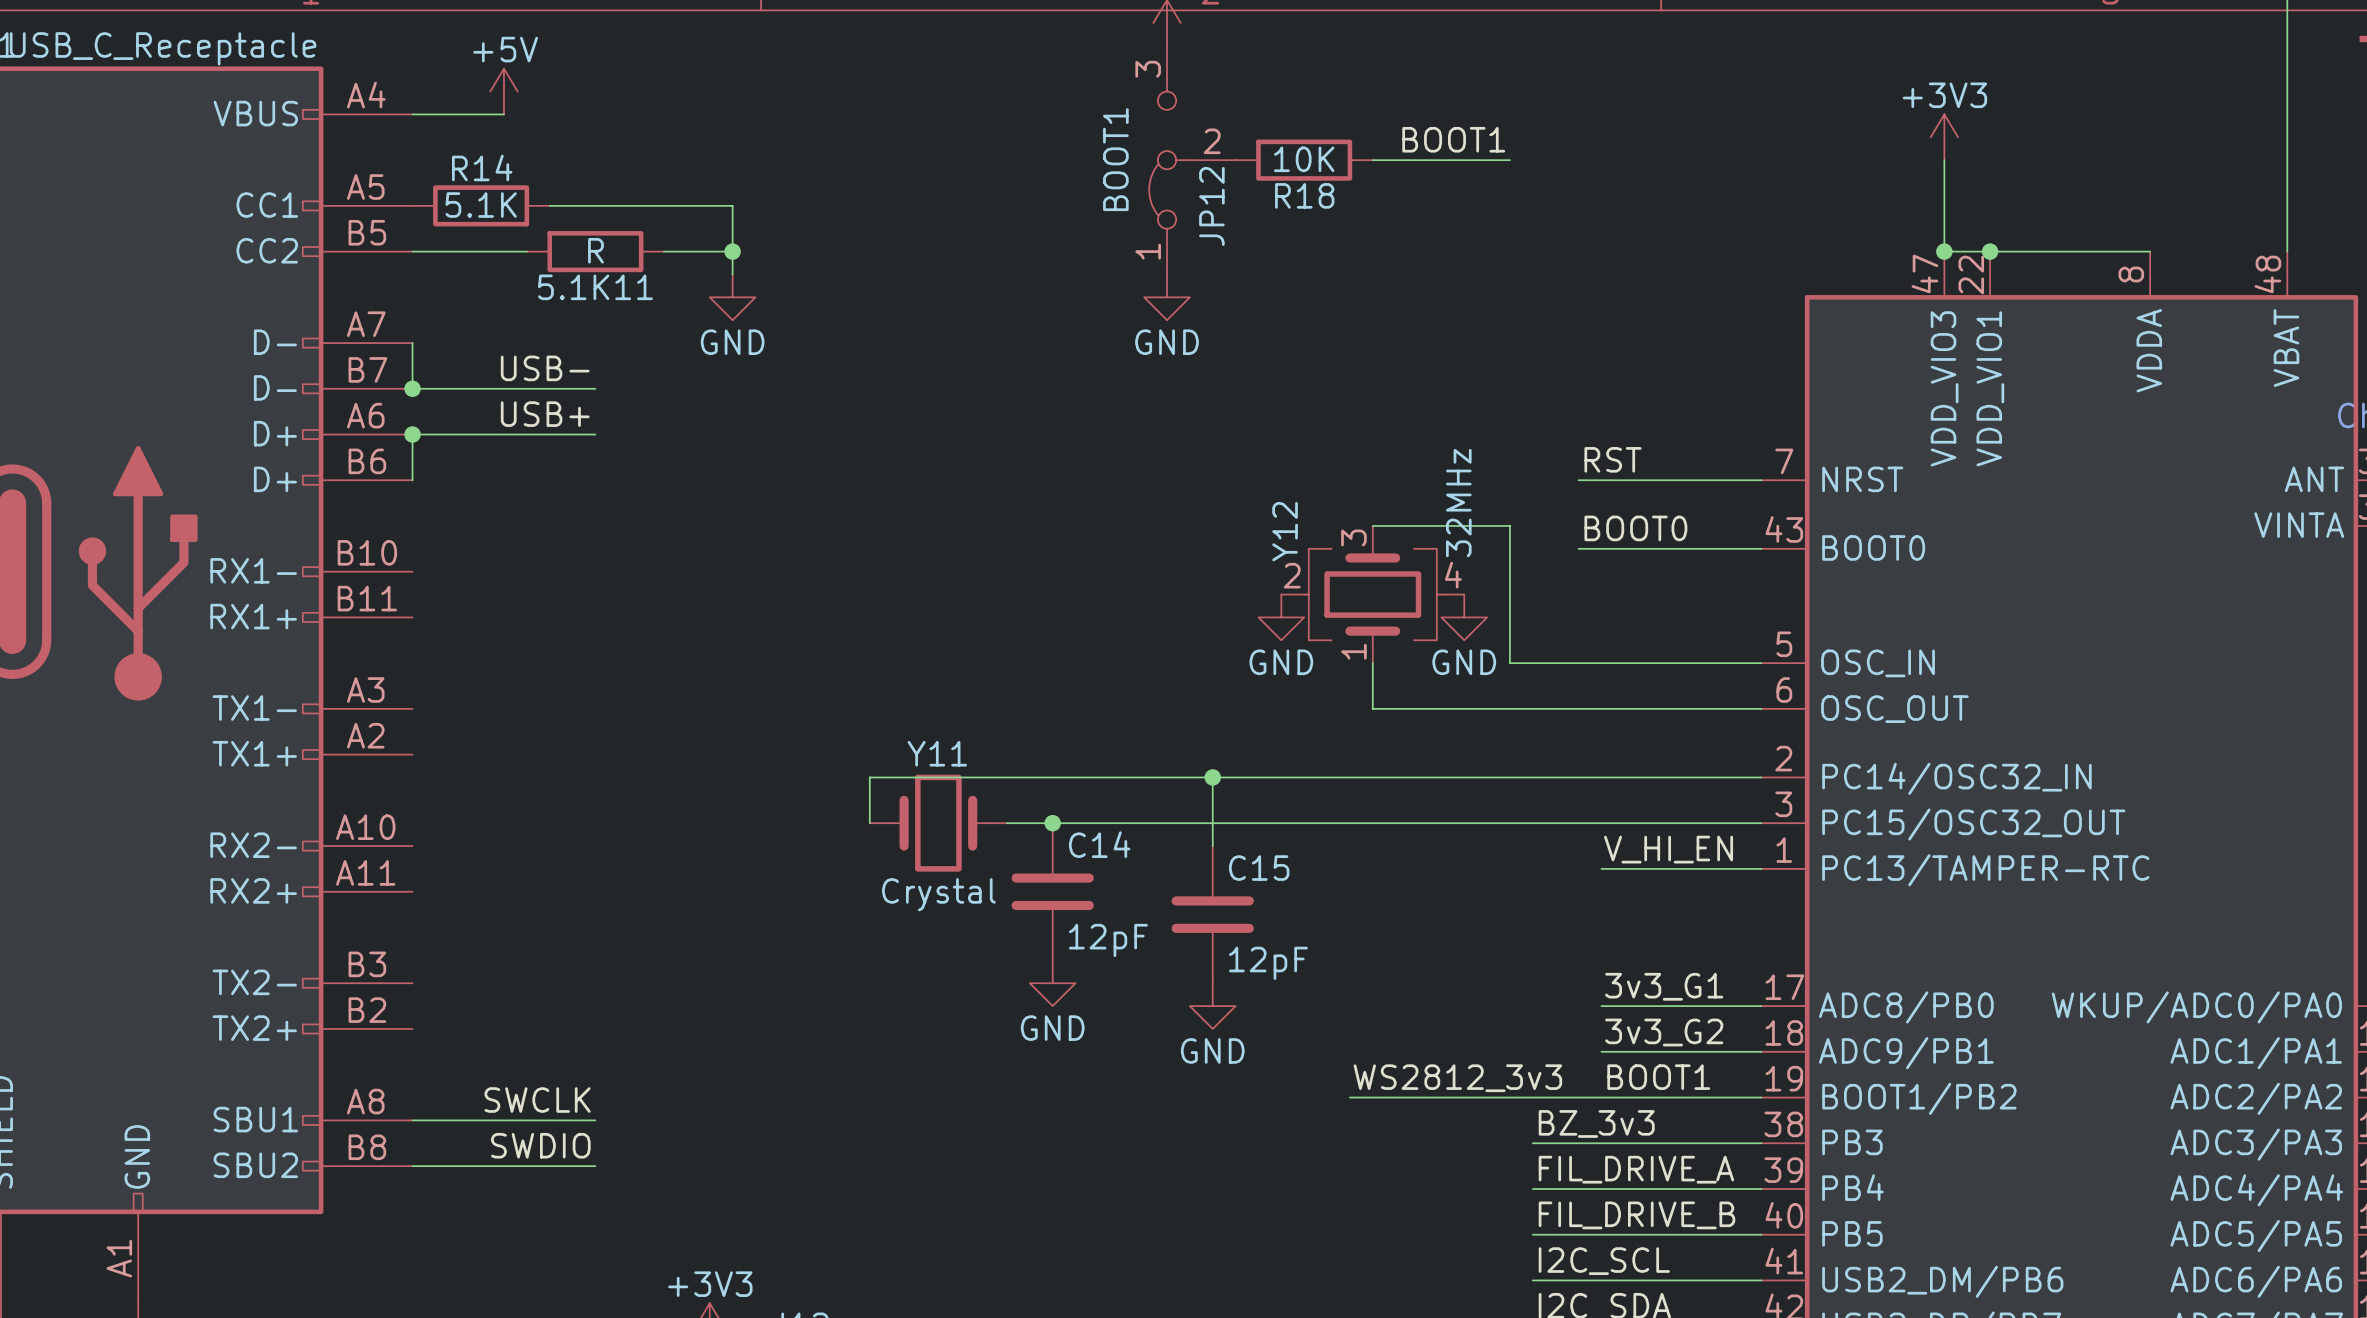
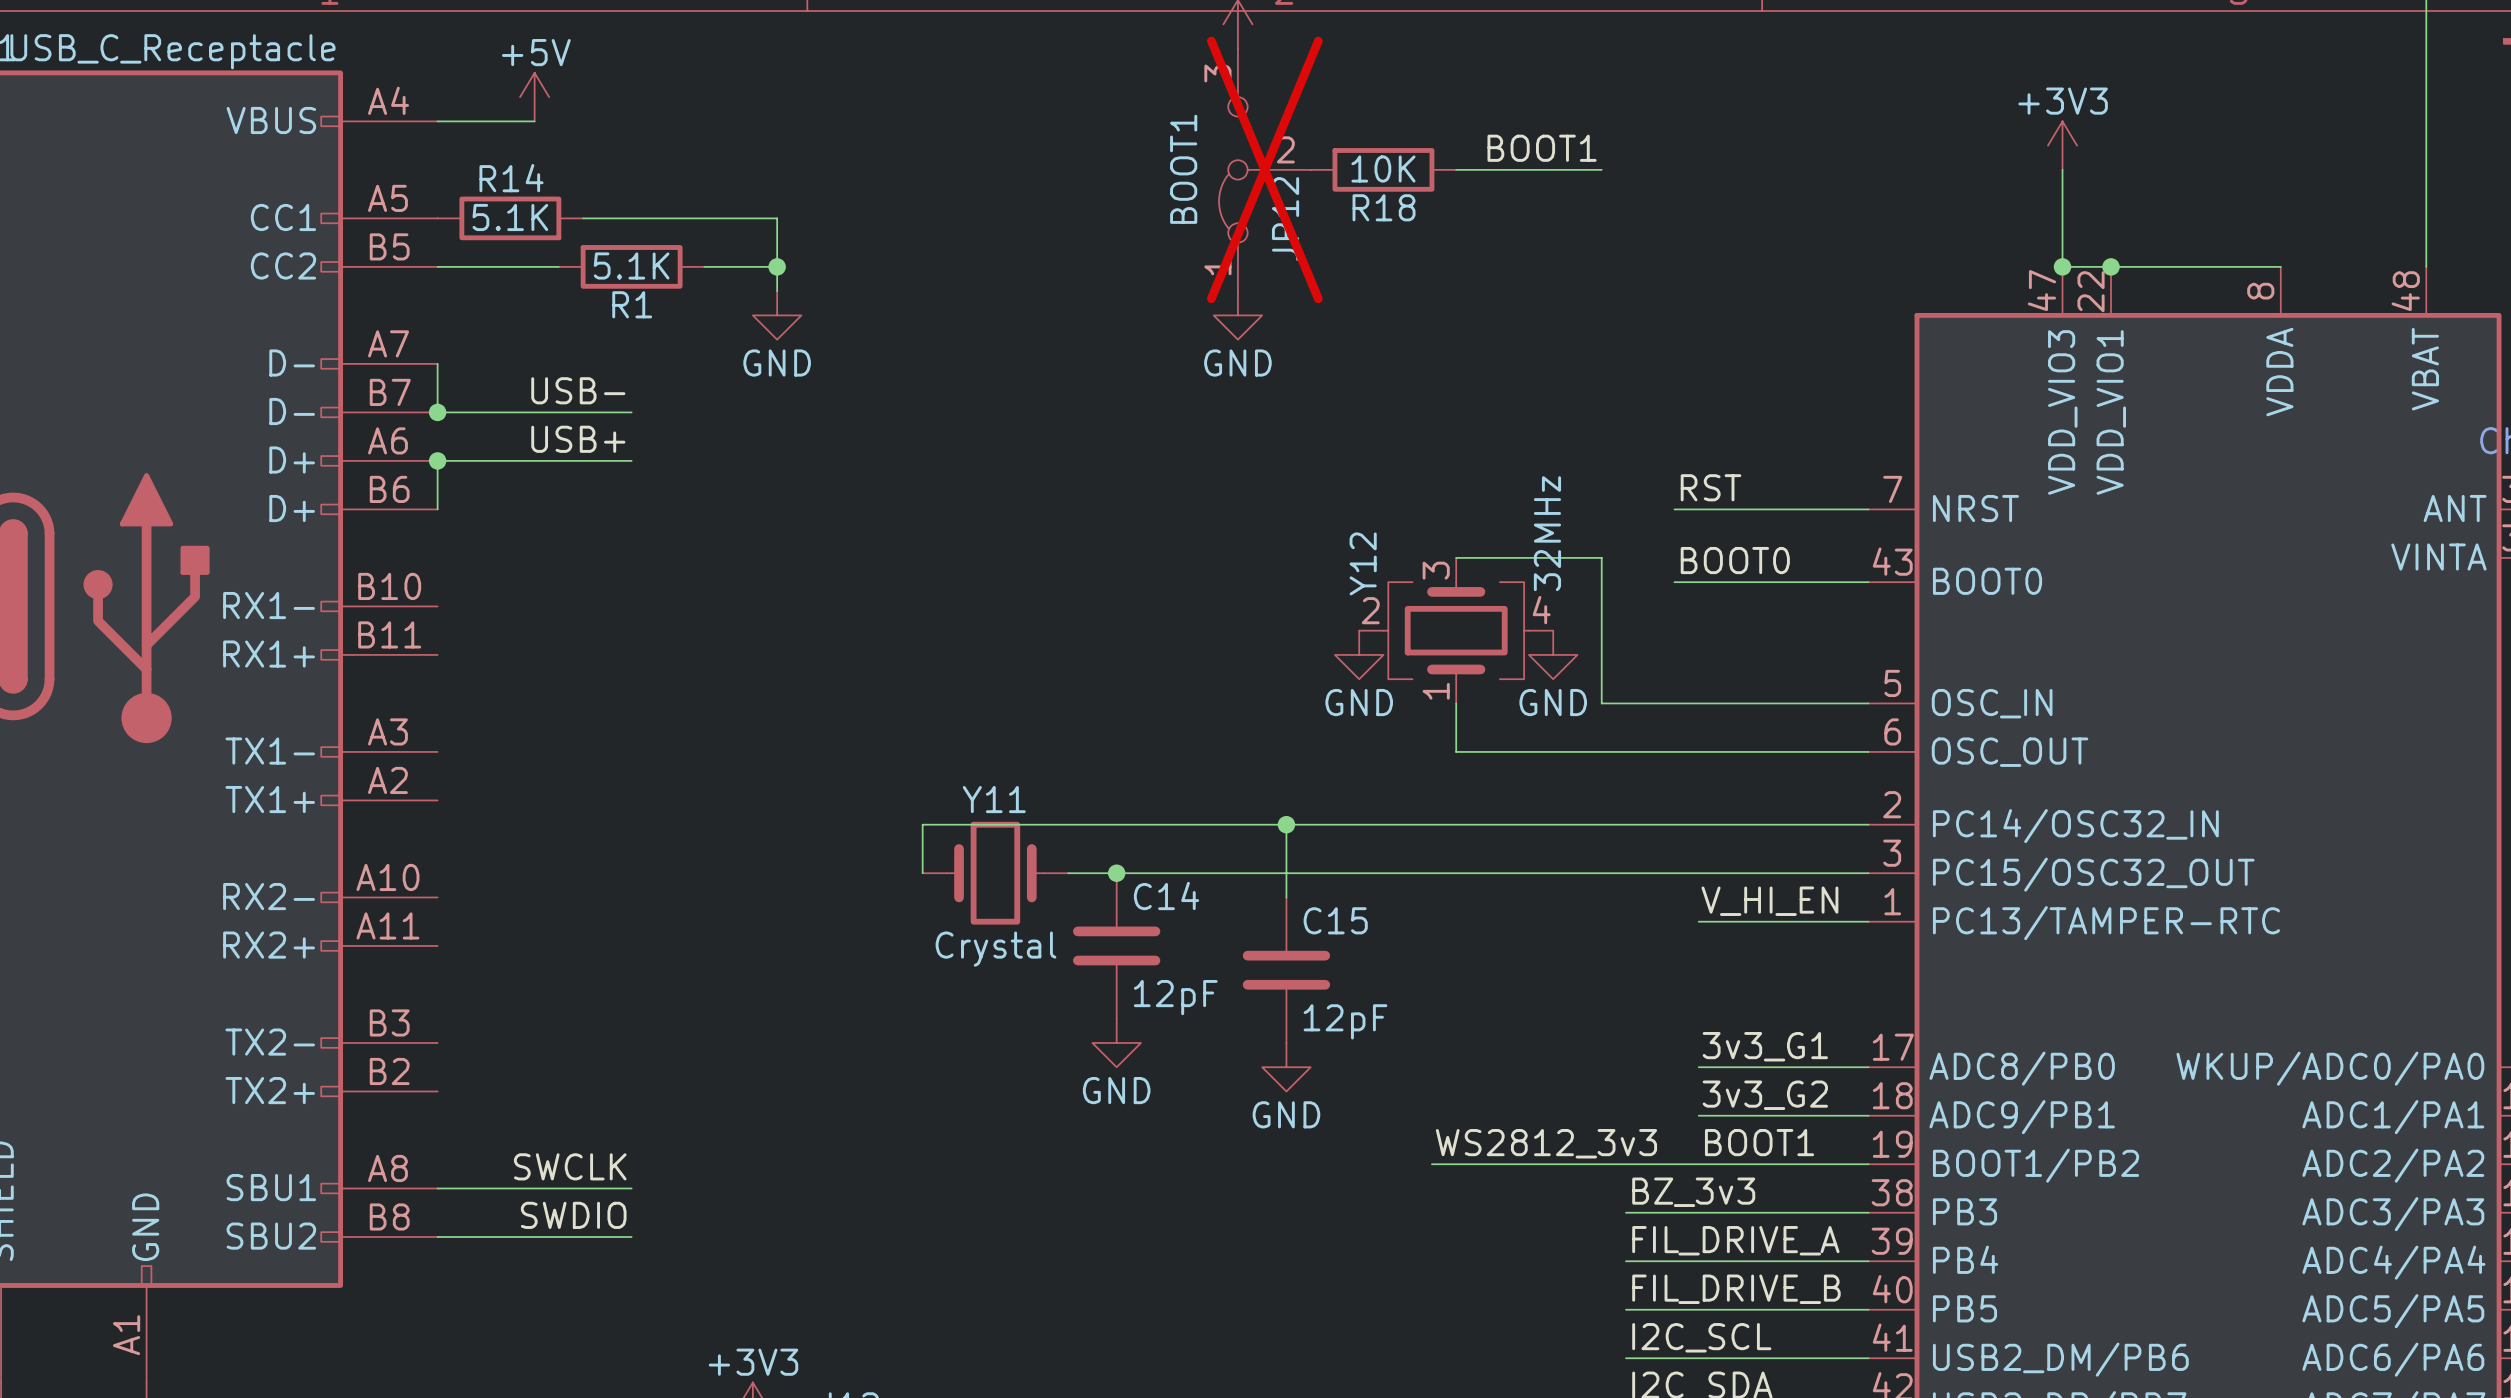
JP12 do-not-place cross: none -> (1264, 169)
5.1K11 value: R (595, 250) -> 5.1K (631, 265)
5.1K11 name: 5.1K11 (595, 287) -> R1 (632, 304)

